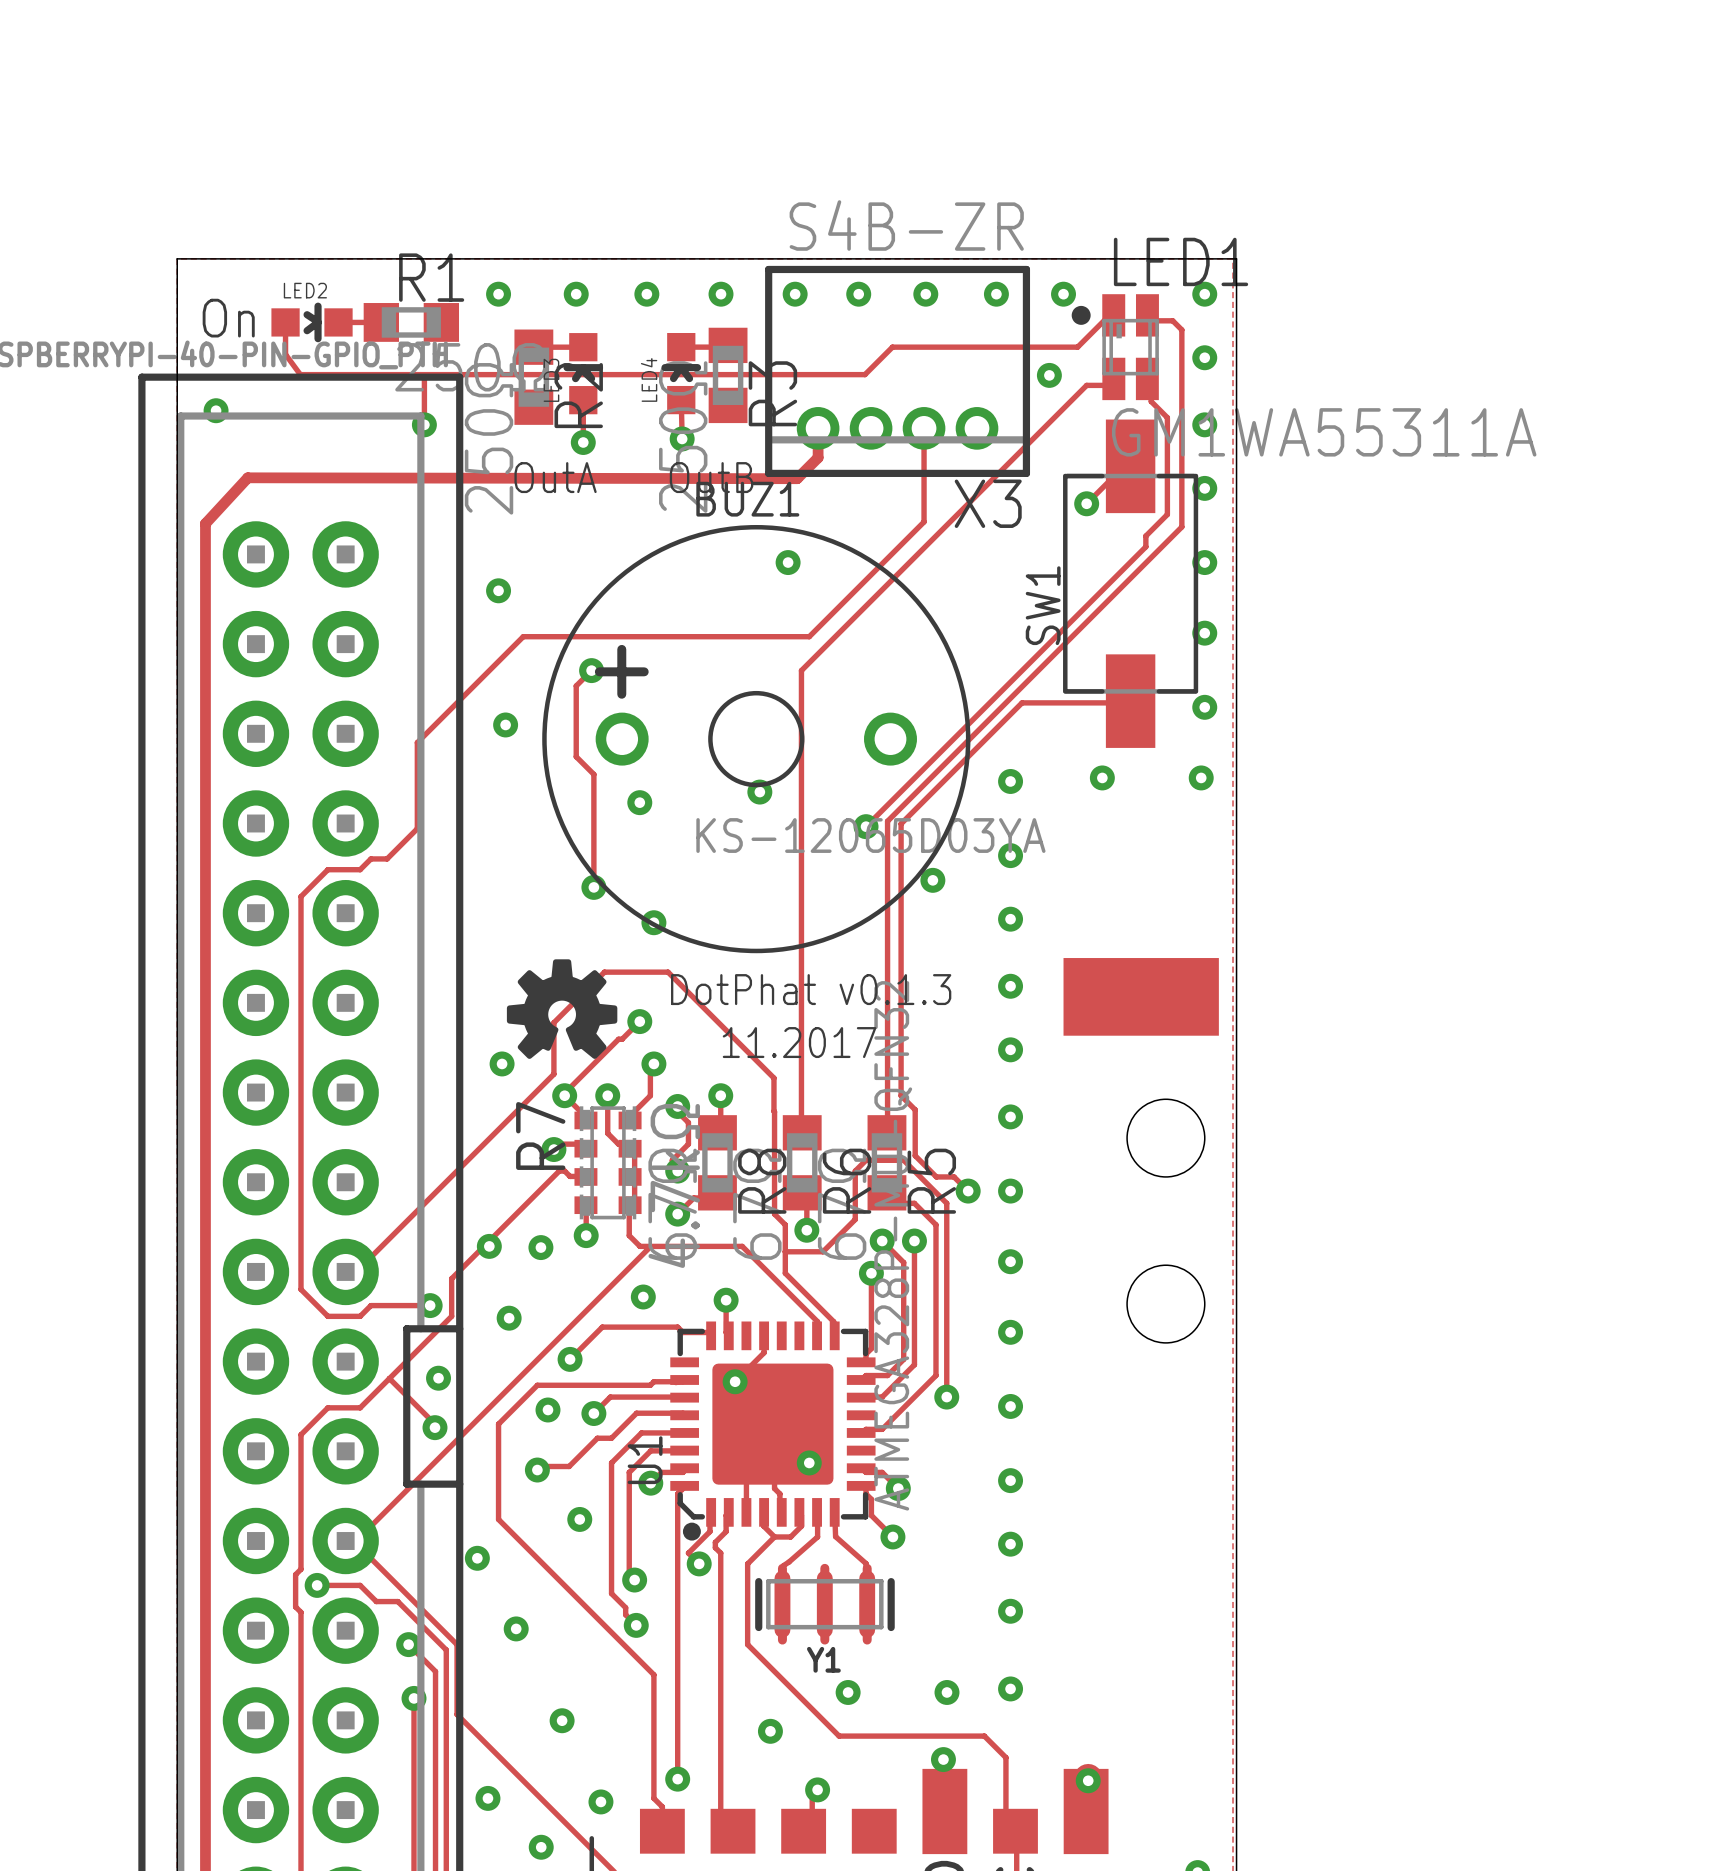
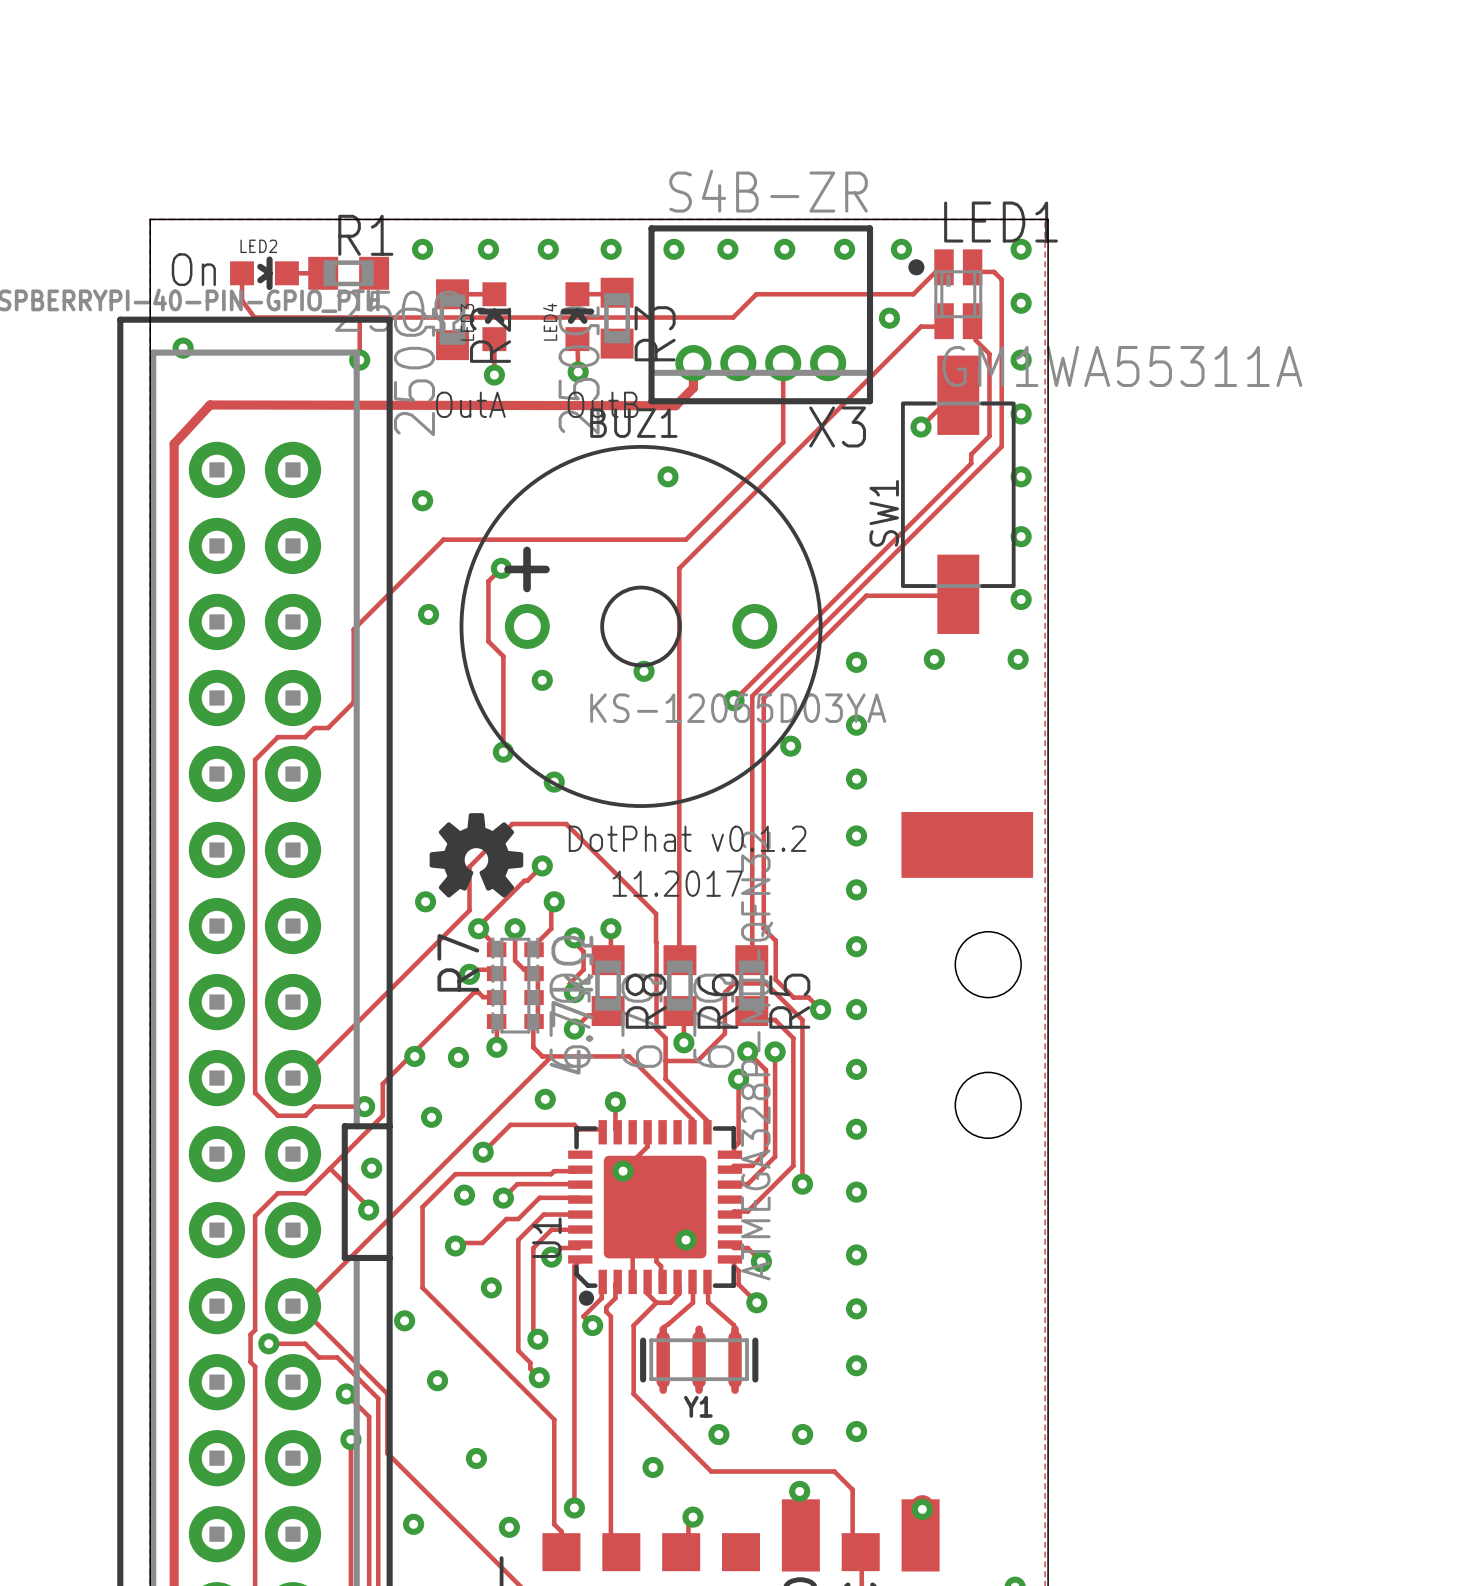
text: DotPhat v0.1.3 (811, 989) -> DotPhat v0.1.2 (687, 838)
via: (541, 1847) -> none

